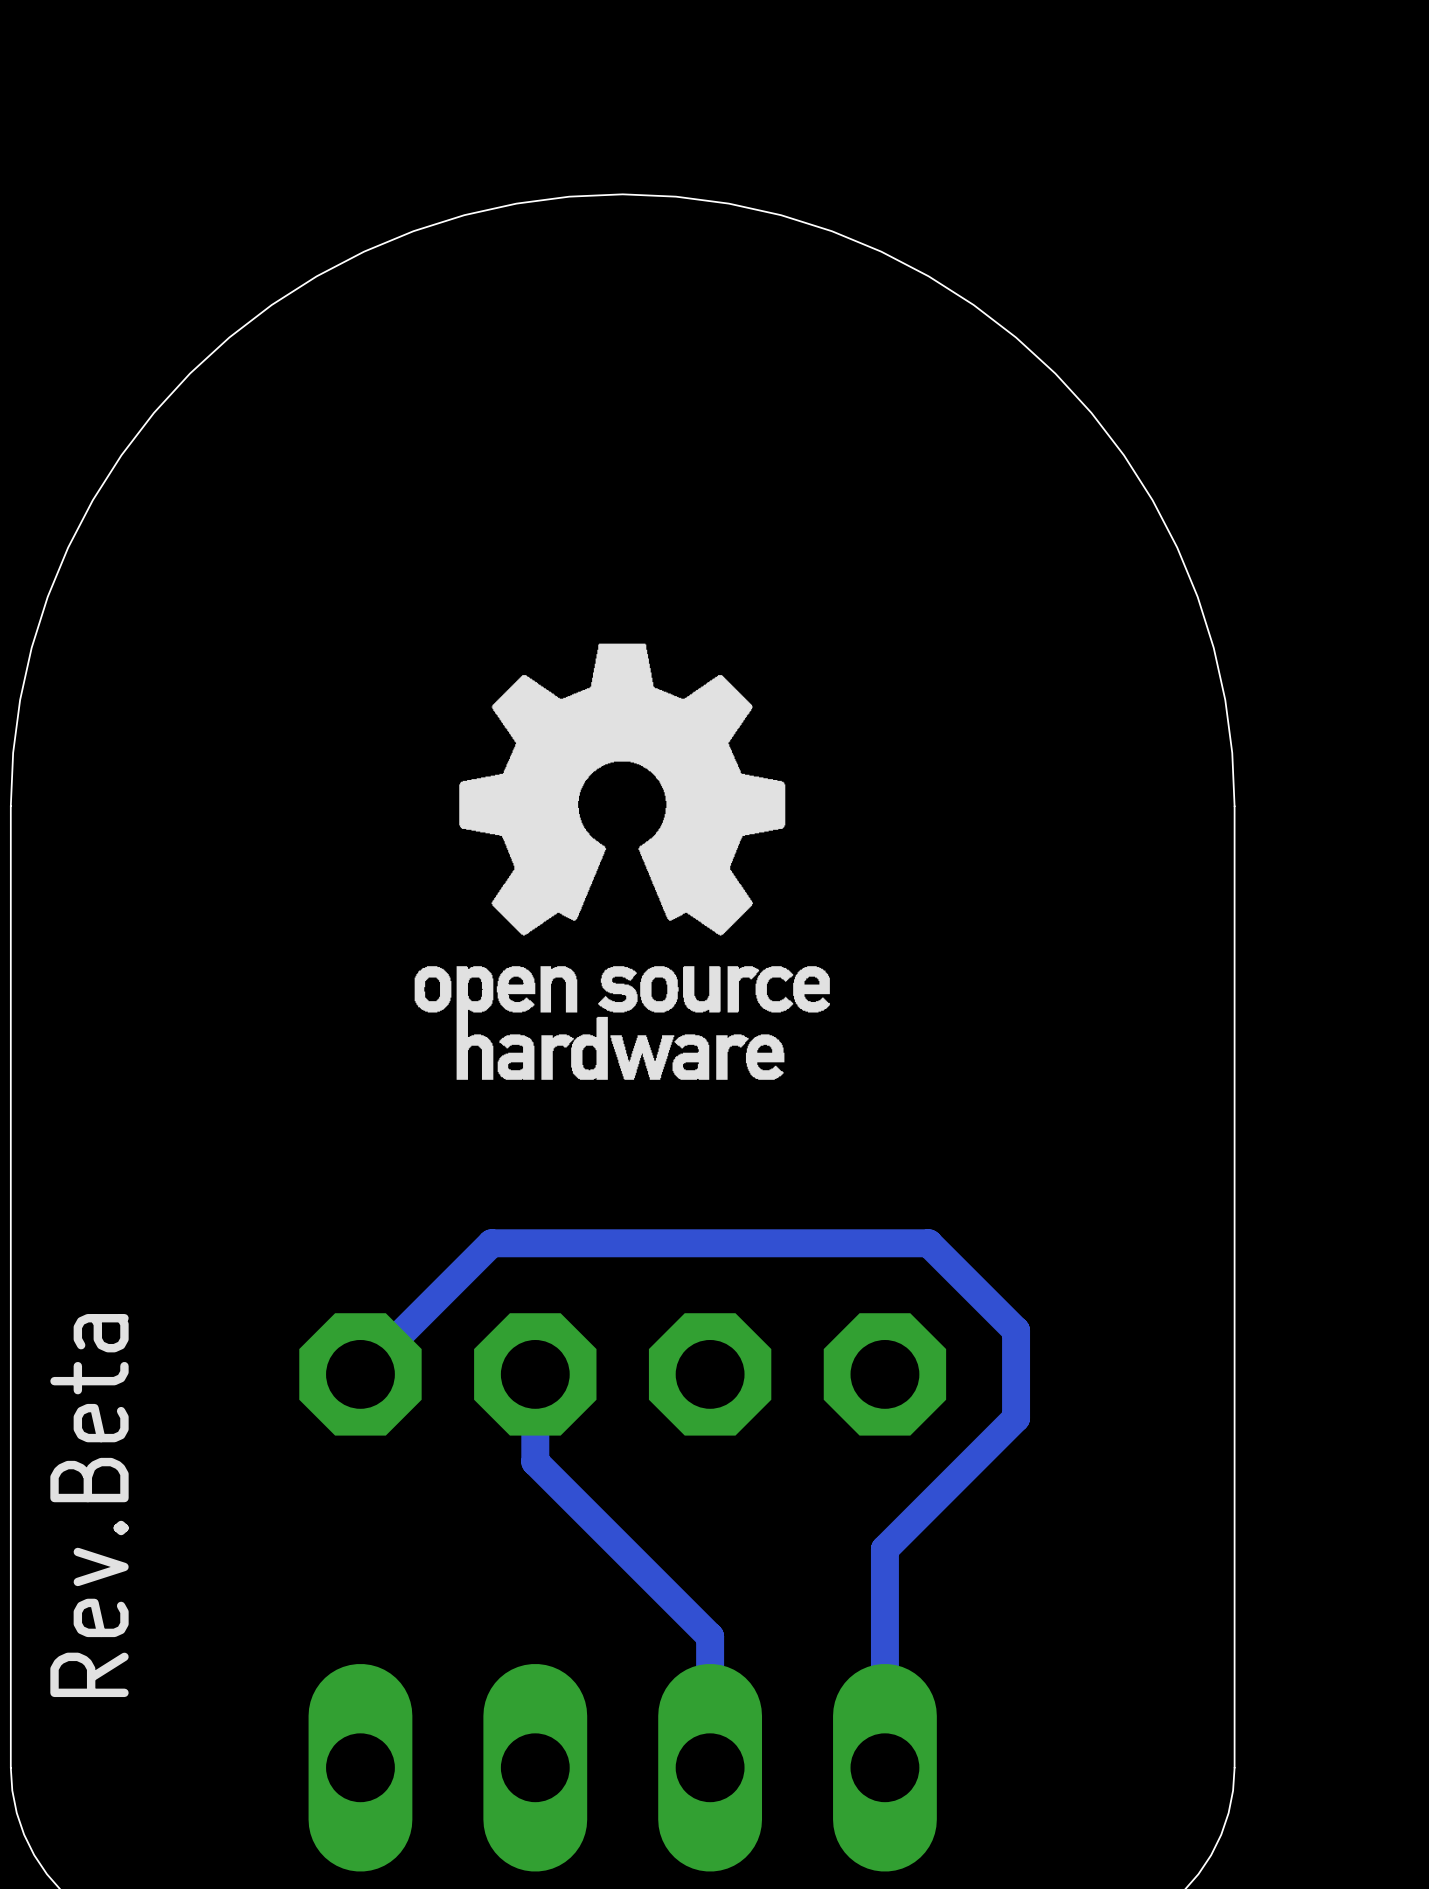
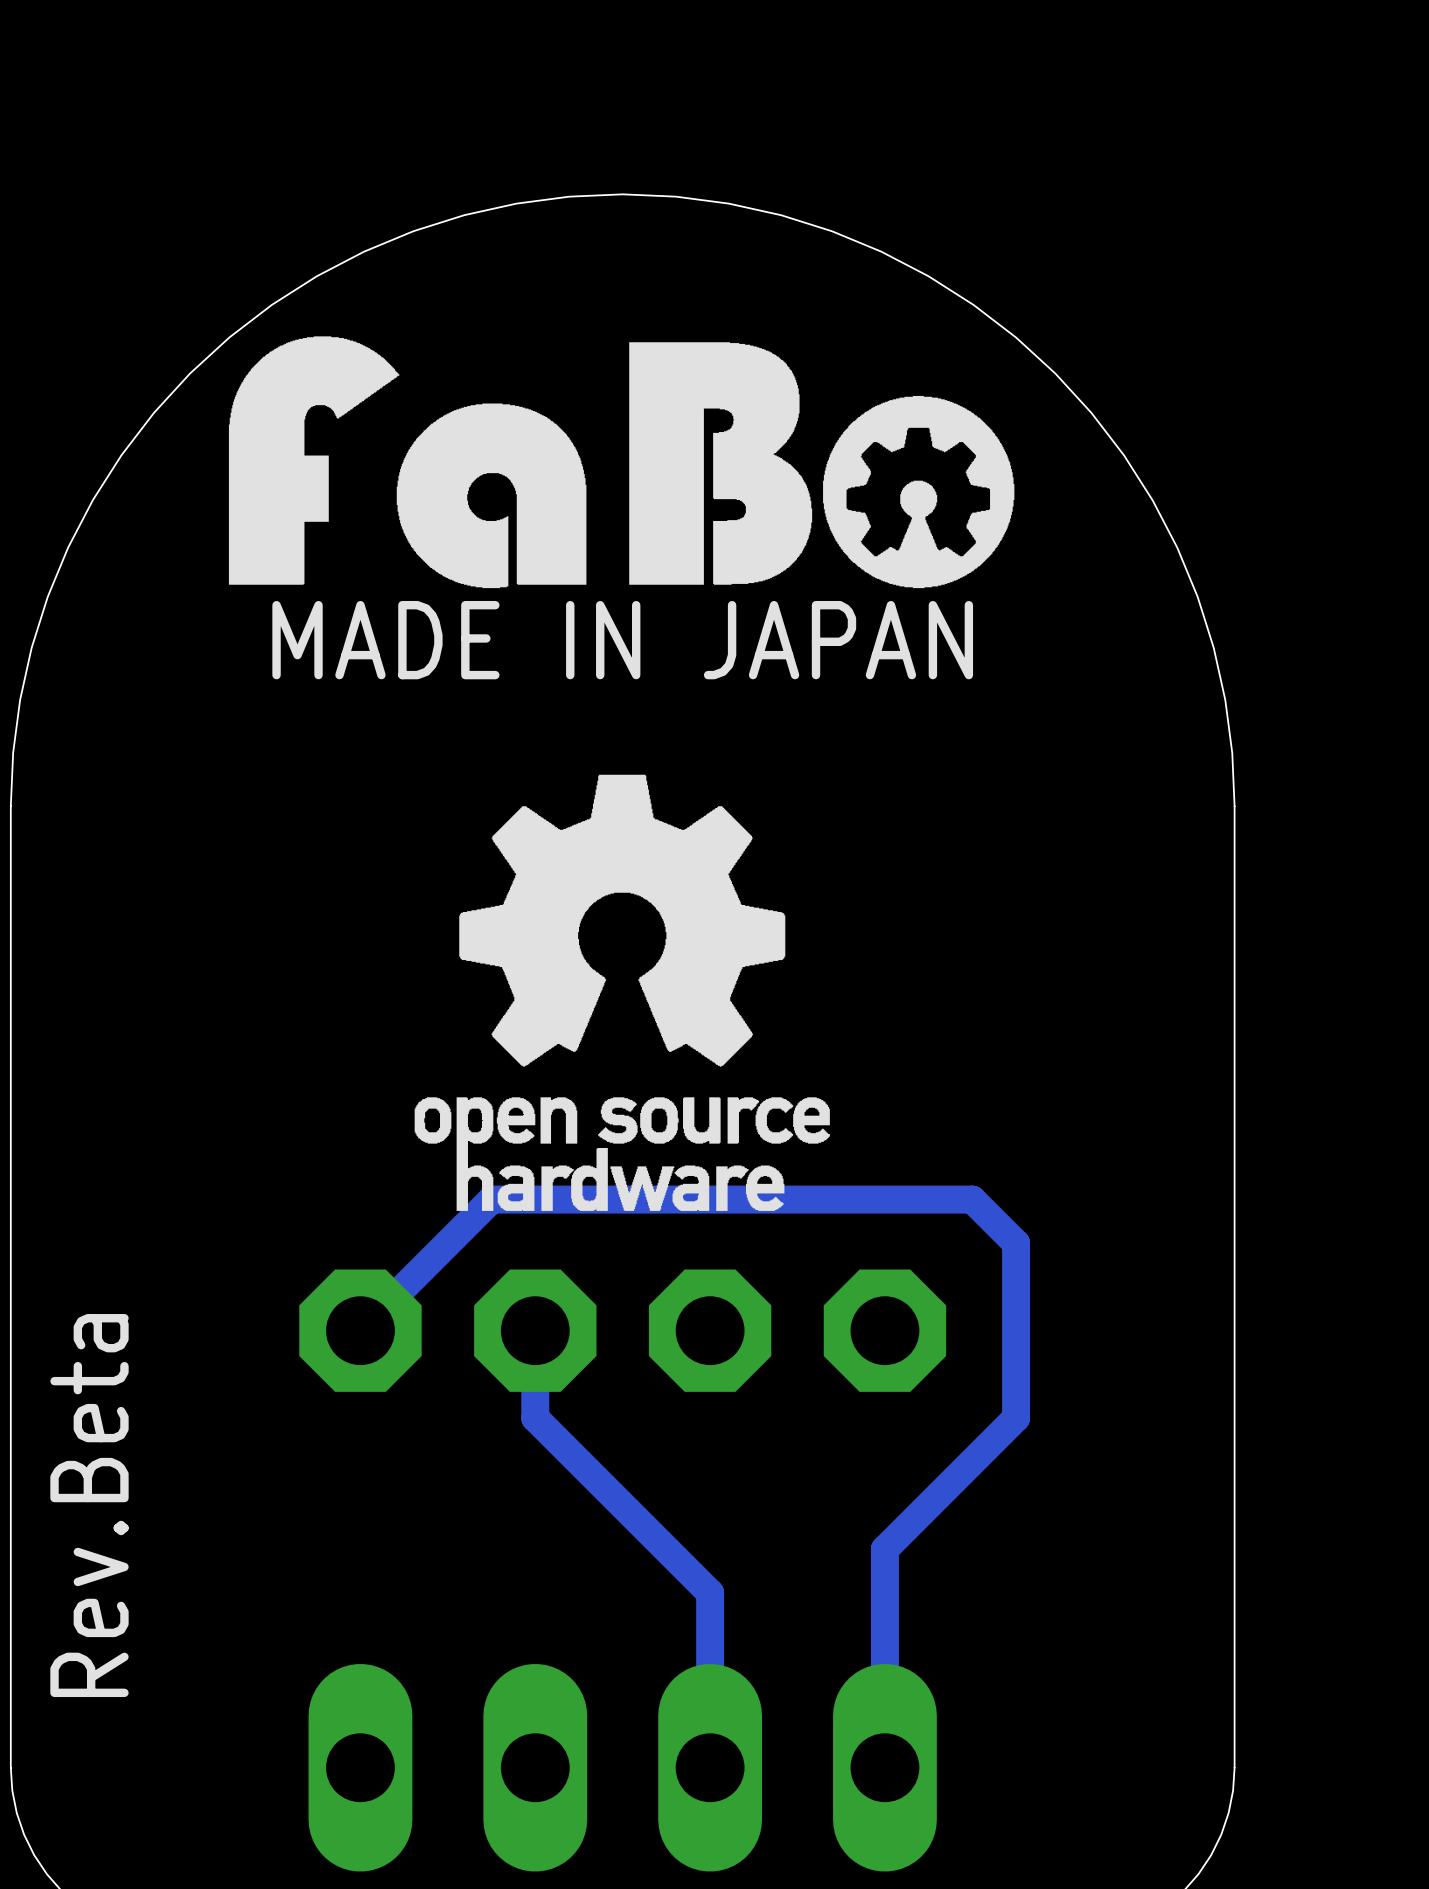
drawing: none -> [228, 336, 1015, 589]
text: none -> MADE IN JAPAN (622, 640)
drawing position: (622, 861) -> (622, 992)
track: (1016, 1330) (928, 1243) (491, 1243) (360, 1374) -> (1016, 1330) (1016, 1243) (972, 1199) (491, 1199) (360, 1330)
part position: (622, 1374) -> (622, 1330)
track: (535, 1418) (535, 1461) (710, 1636) -> (535, 1418) (710, 1592) (710, 1636)

